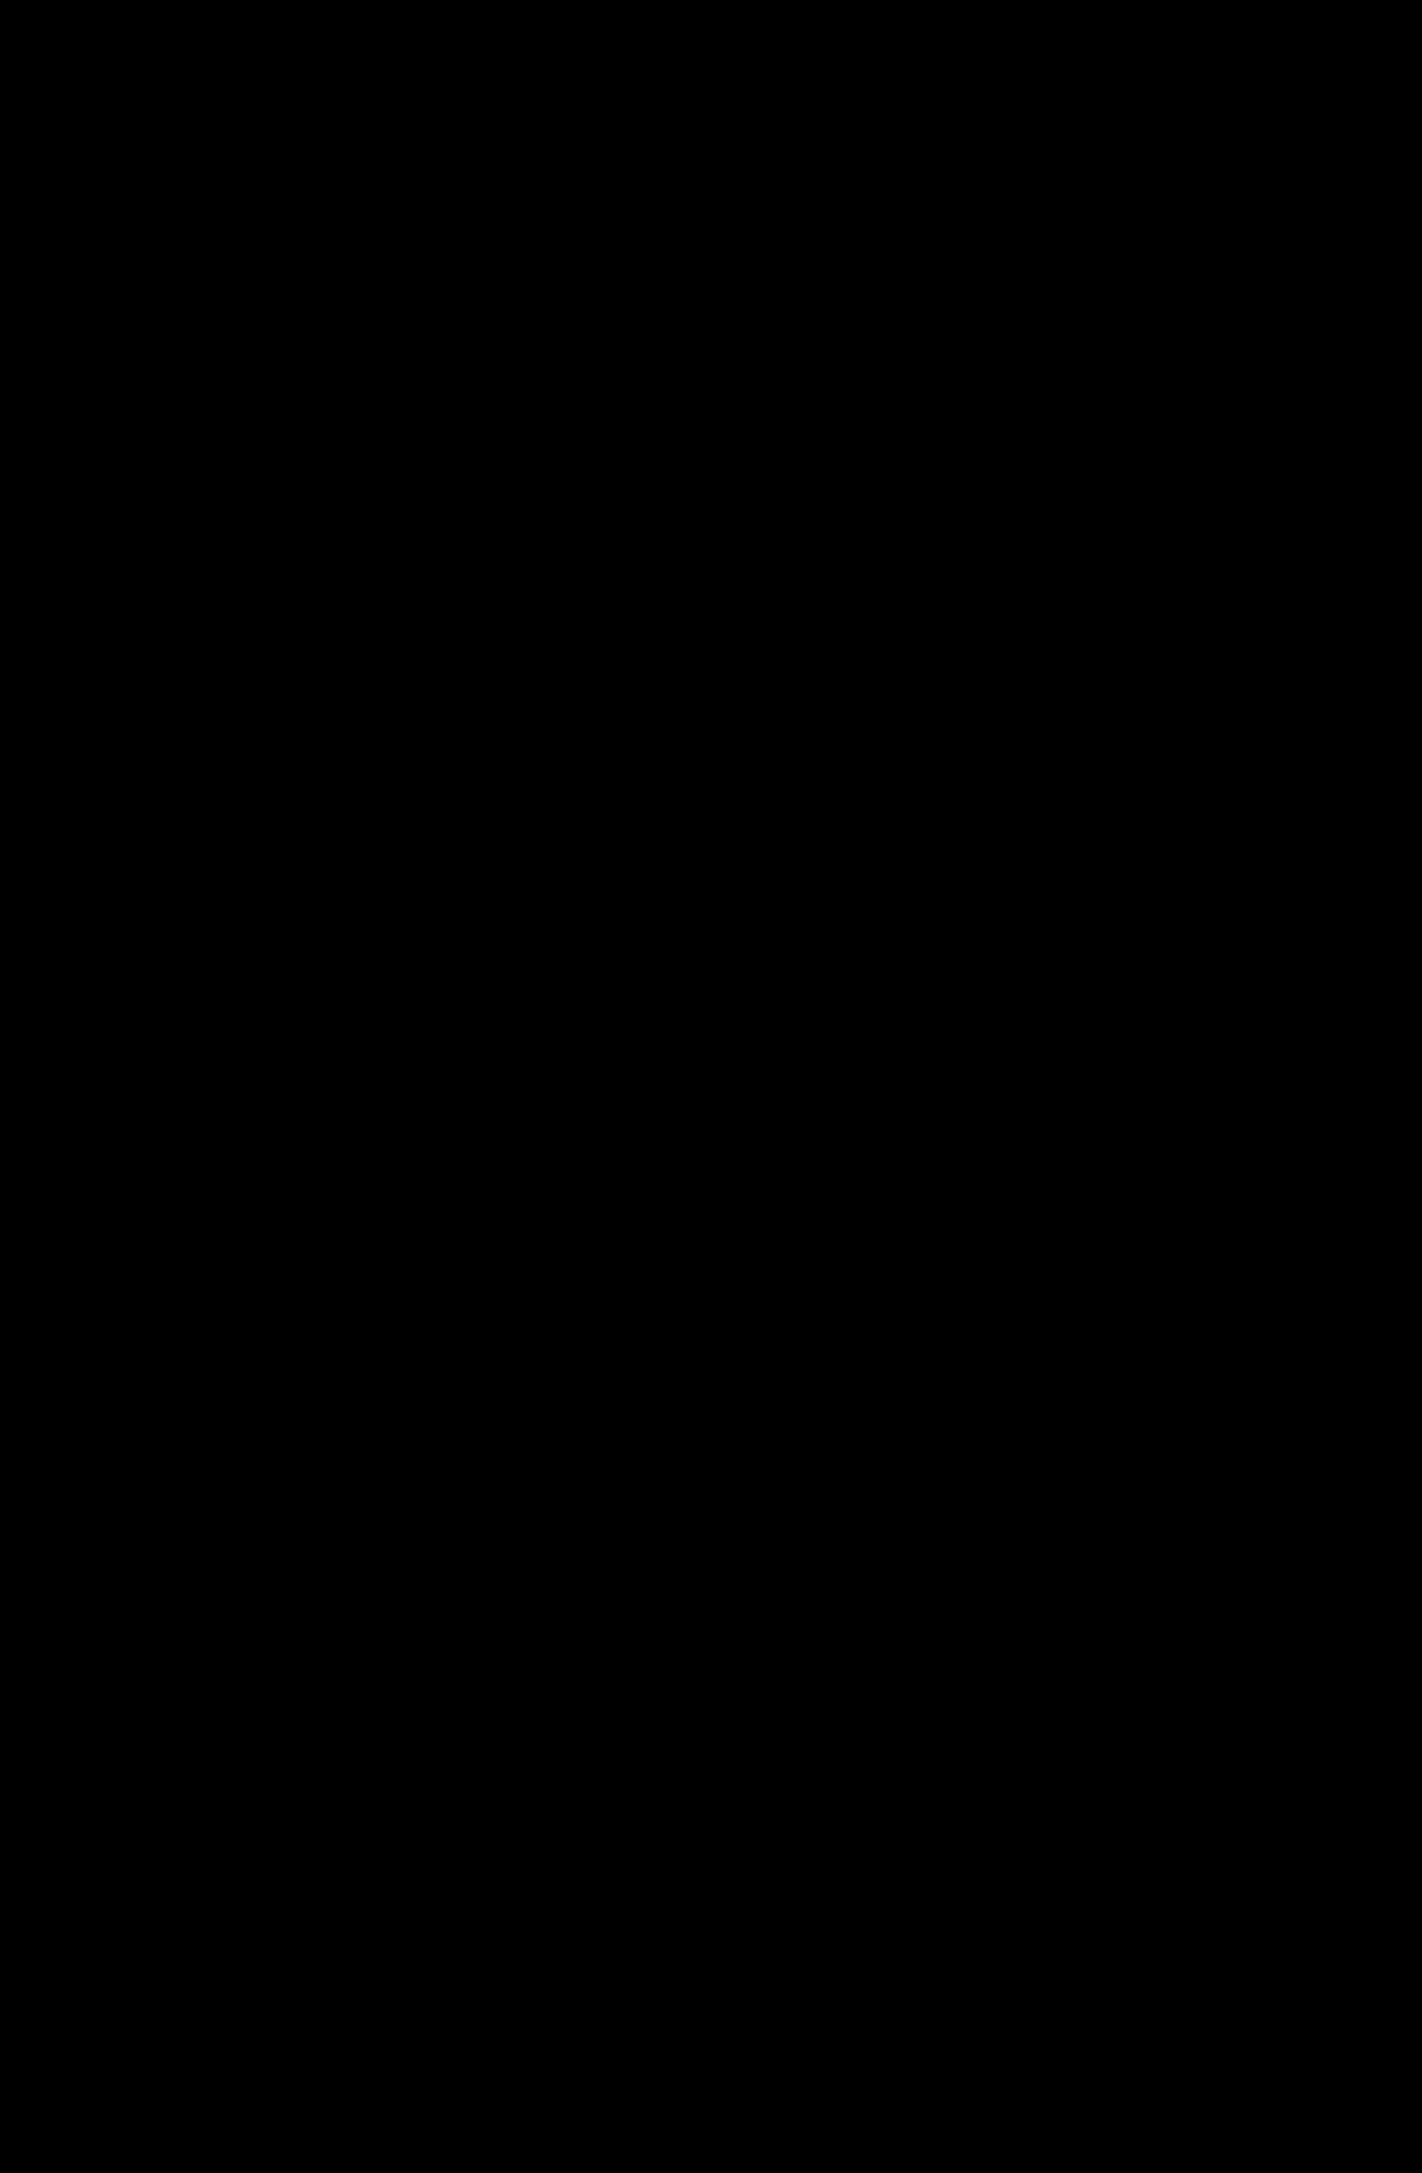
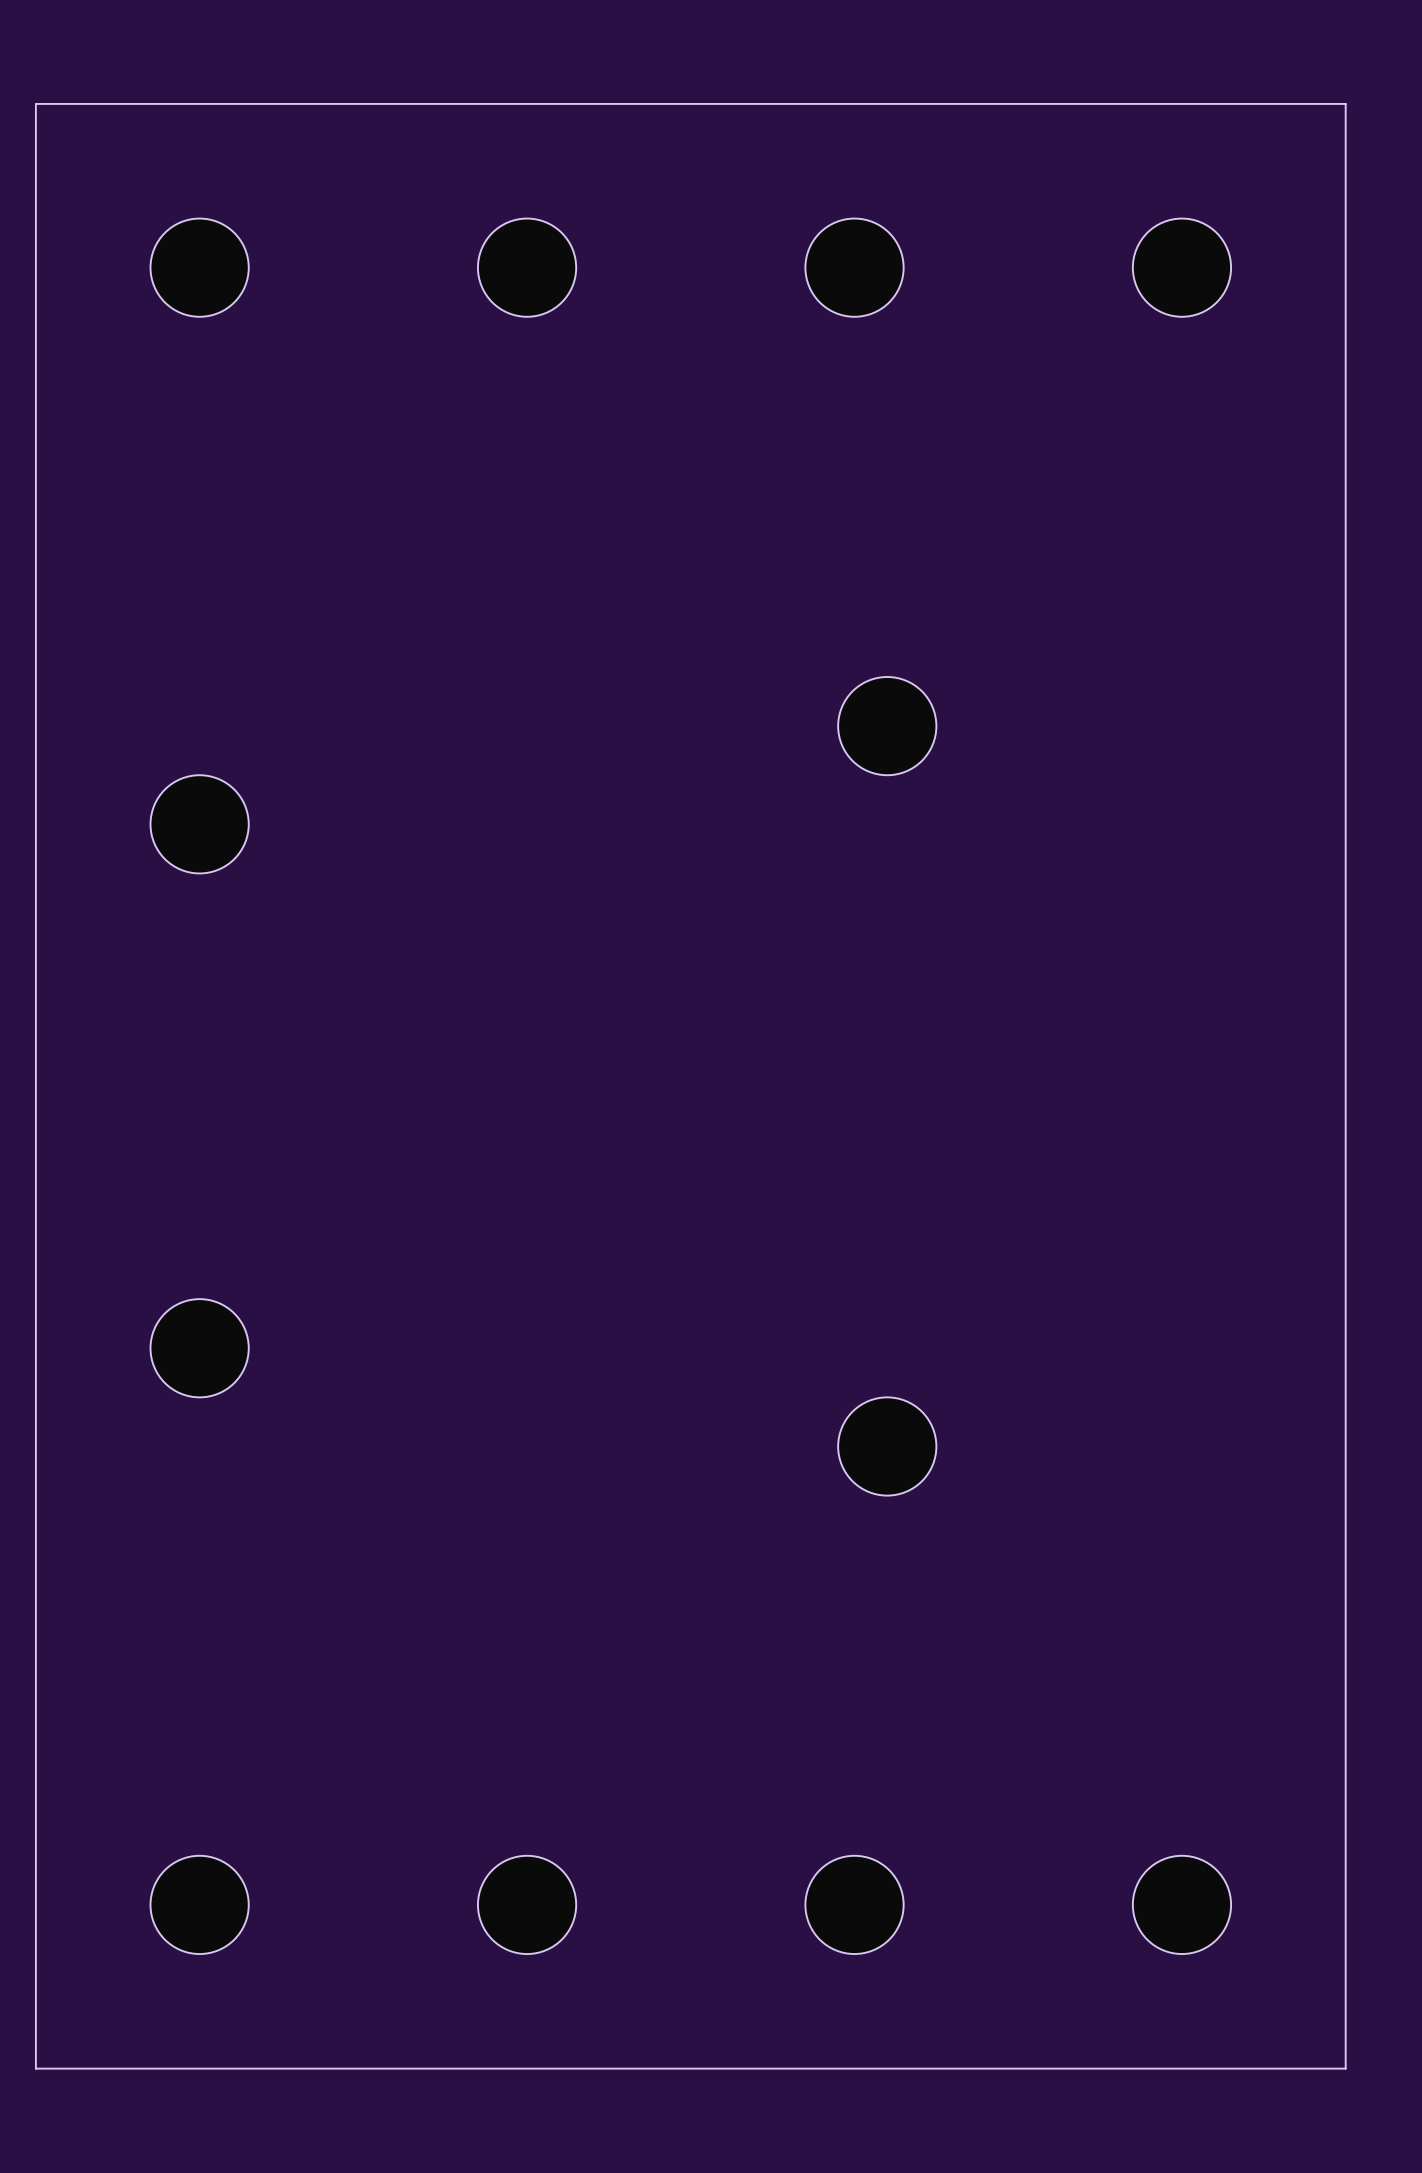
board edge: none -> (35, 103) (35, 2068) (1345, 2068) (1345, 103) (35, 103)
hole: none -> (199, 267)
hole: none -> (527, 267)
hole: none -> (854, 267)
hole: none -> (1181, 267)
hole: none -> (887, 726)
hole: none -> (199, 824)
hole: none -> (199, 1348)
hole: none -> (887, 1446)
hole: none -> (199, 1904)
hole: none -> (527, 1904)
hole: none -> (854, 1904)
hole: none -> (1181, 1904)

